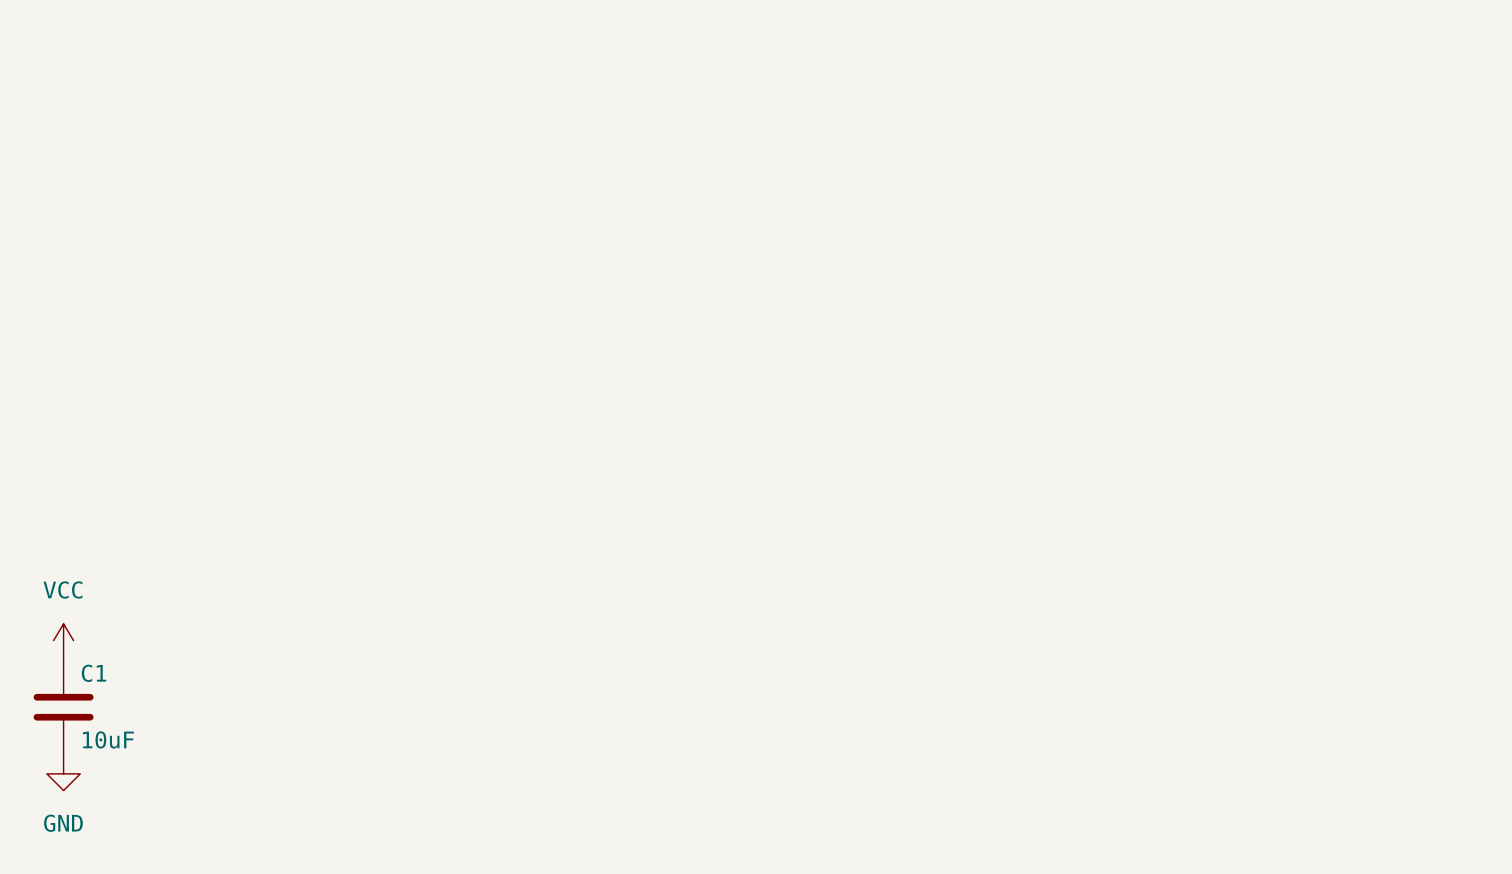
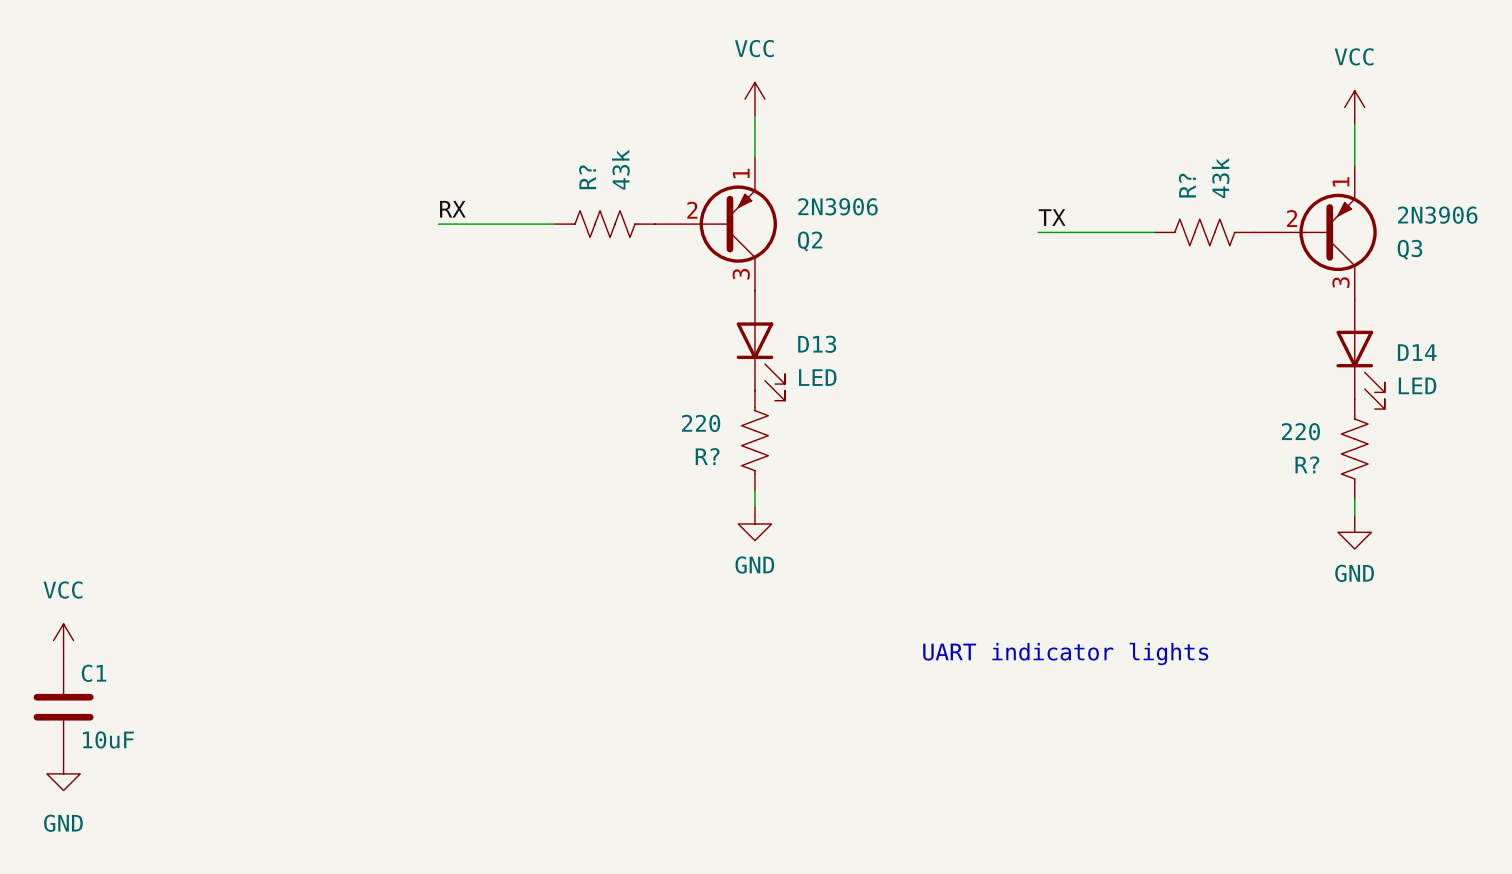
power symbol: none -> VCC (754, 99)
power symbol: none -> VCC (1354, 107)
wire: none -> (754, 115) (754, 157)
wire: none -> (1354, 124) (1354, 165)
label: none -> RX (452, 209)
label: none -> TX (1052, 217)
wire: none -> (438, 224) (555, 224)
R?: none -> 43k (605, 224)
Q2: none -> 2N3906 (715, 224)
wire: none -> (1038, 232) (1154, 232)
R?: none -> 43k (1204, 232)
Q3: none -> 2N3906 (1315, 232)
D13: none -> LED (760, 345)
D14: none -> LED (1360, 354)
R?: none -> 220 (754, 440)
R?: none -> 220 (1354, 449)
wire: none -> (754, 490) (754, 507)
wire: none -> (1354, 498) (1354, 515)
power symbol: none -> GND (754, 523)
power symbol: none -> GND (1354, 532)
text: none -> UART indicator lights (1065, 653)

